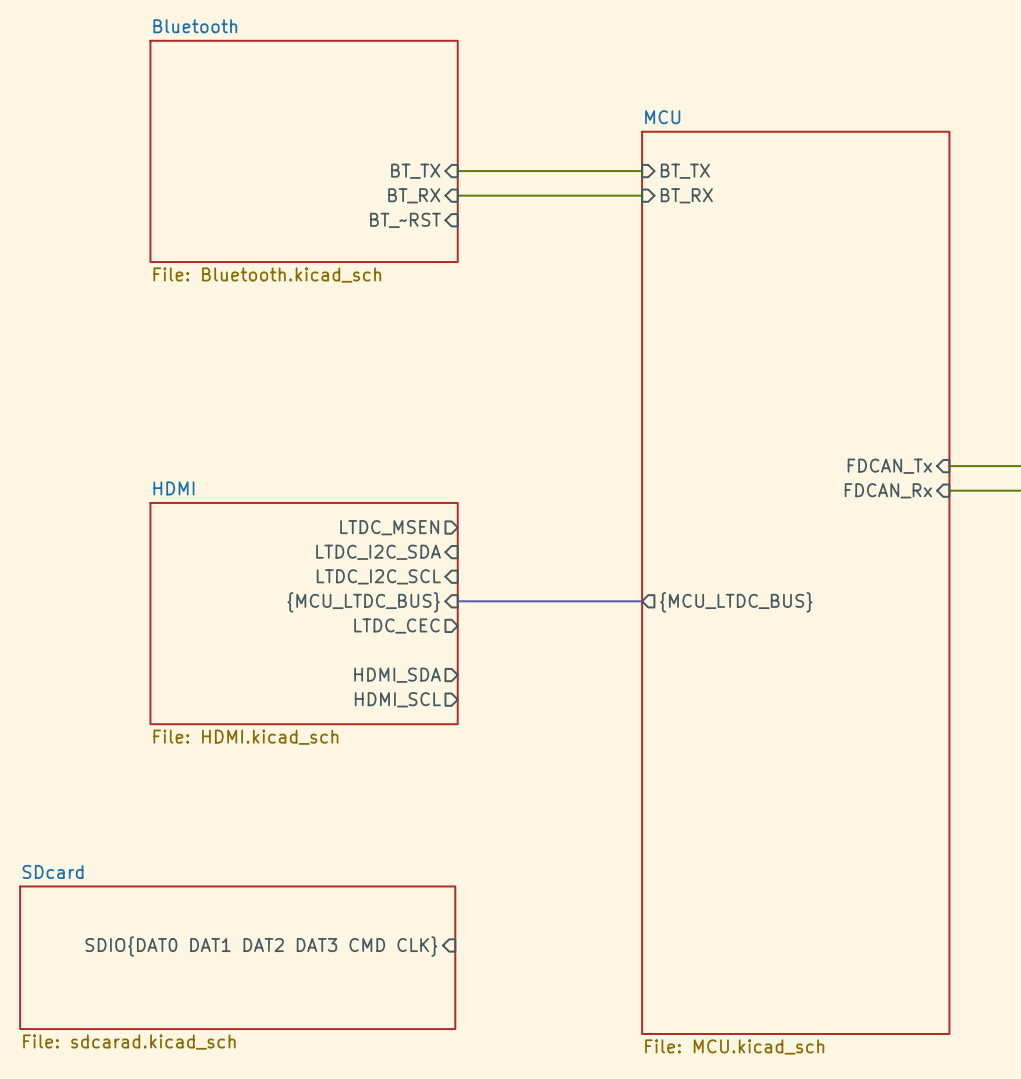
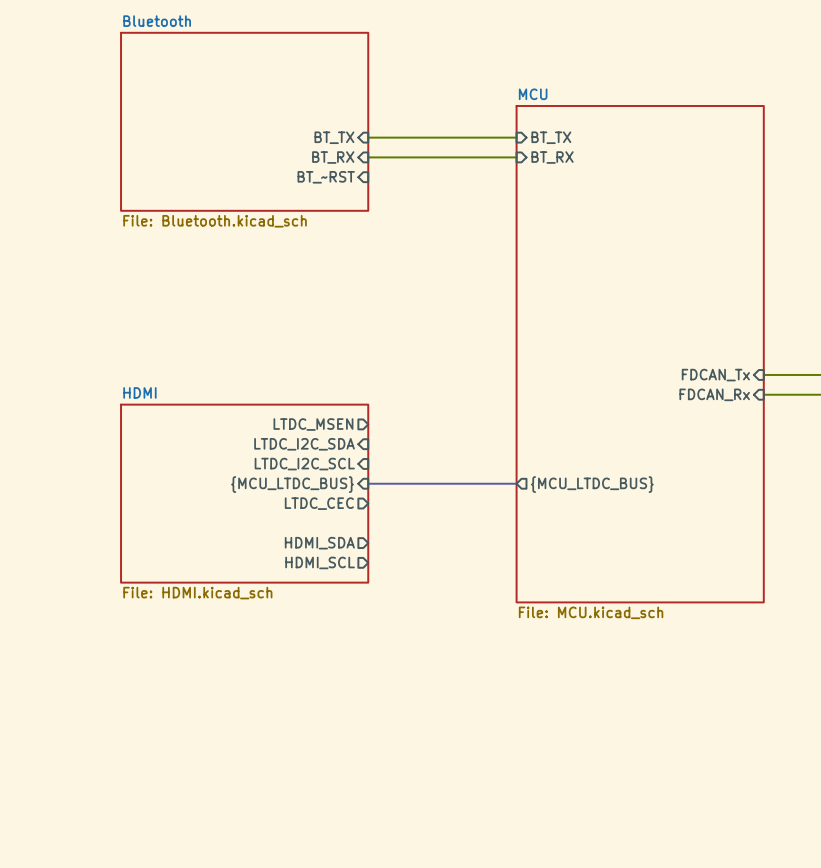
sheet MCU: none -> File: MCU.kicad_sch (640, 354)
sheet MCU: File: MCU.kicad_sch (795, 582) -> none
sheet pin: SDIO{DAT0 DAT1 DAT2 DAT3 CMD CLK} (261, 946) -> none
sheet SDcard: File: sdcarad.kicad_sch (237, 957) -> none

